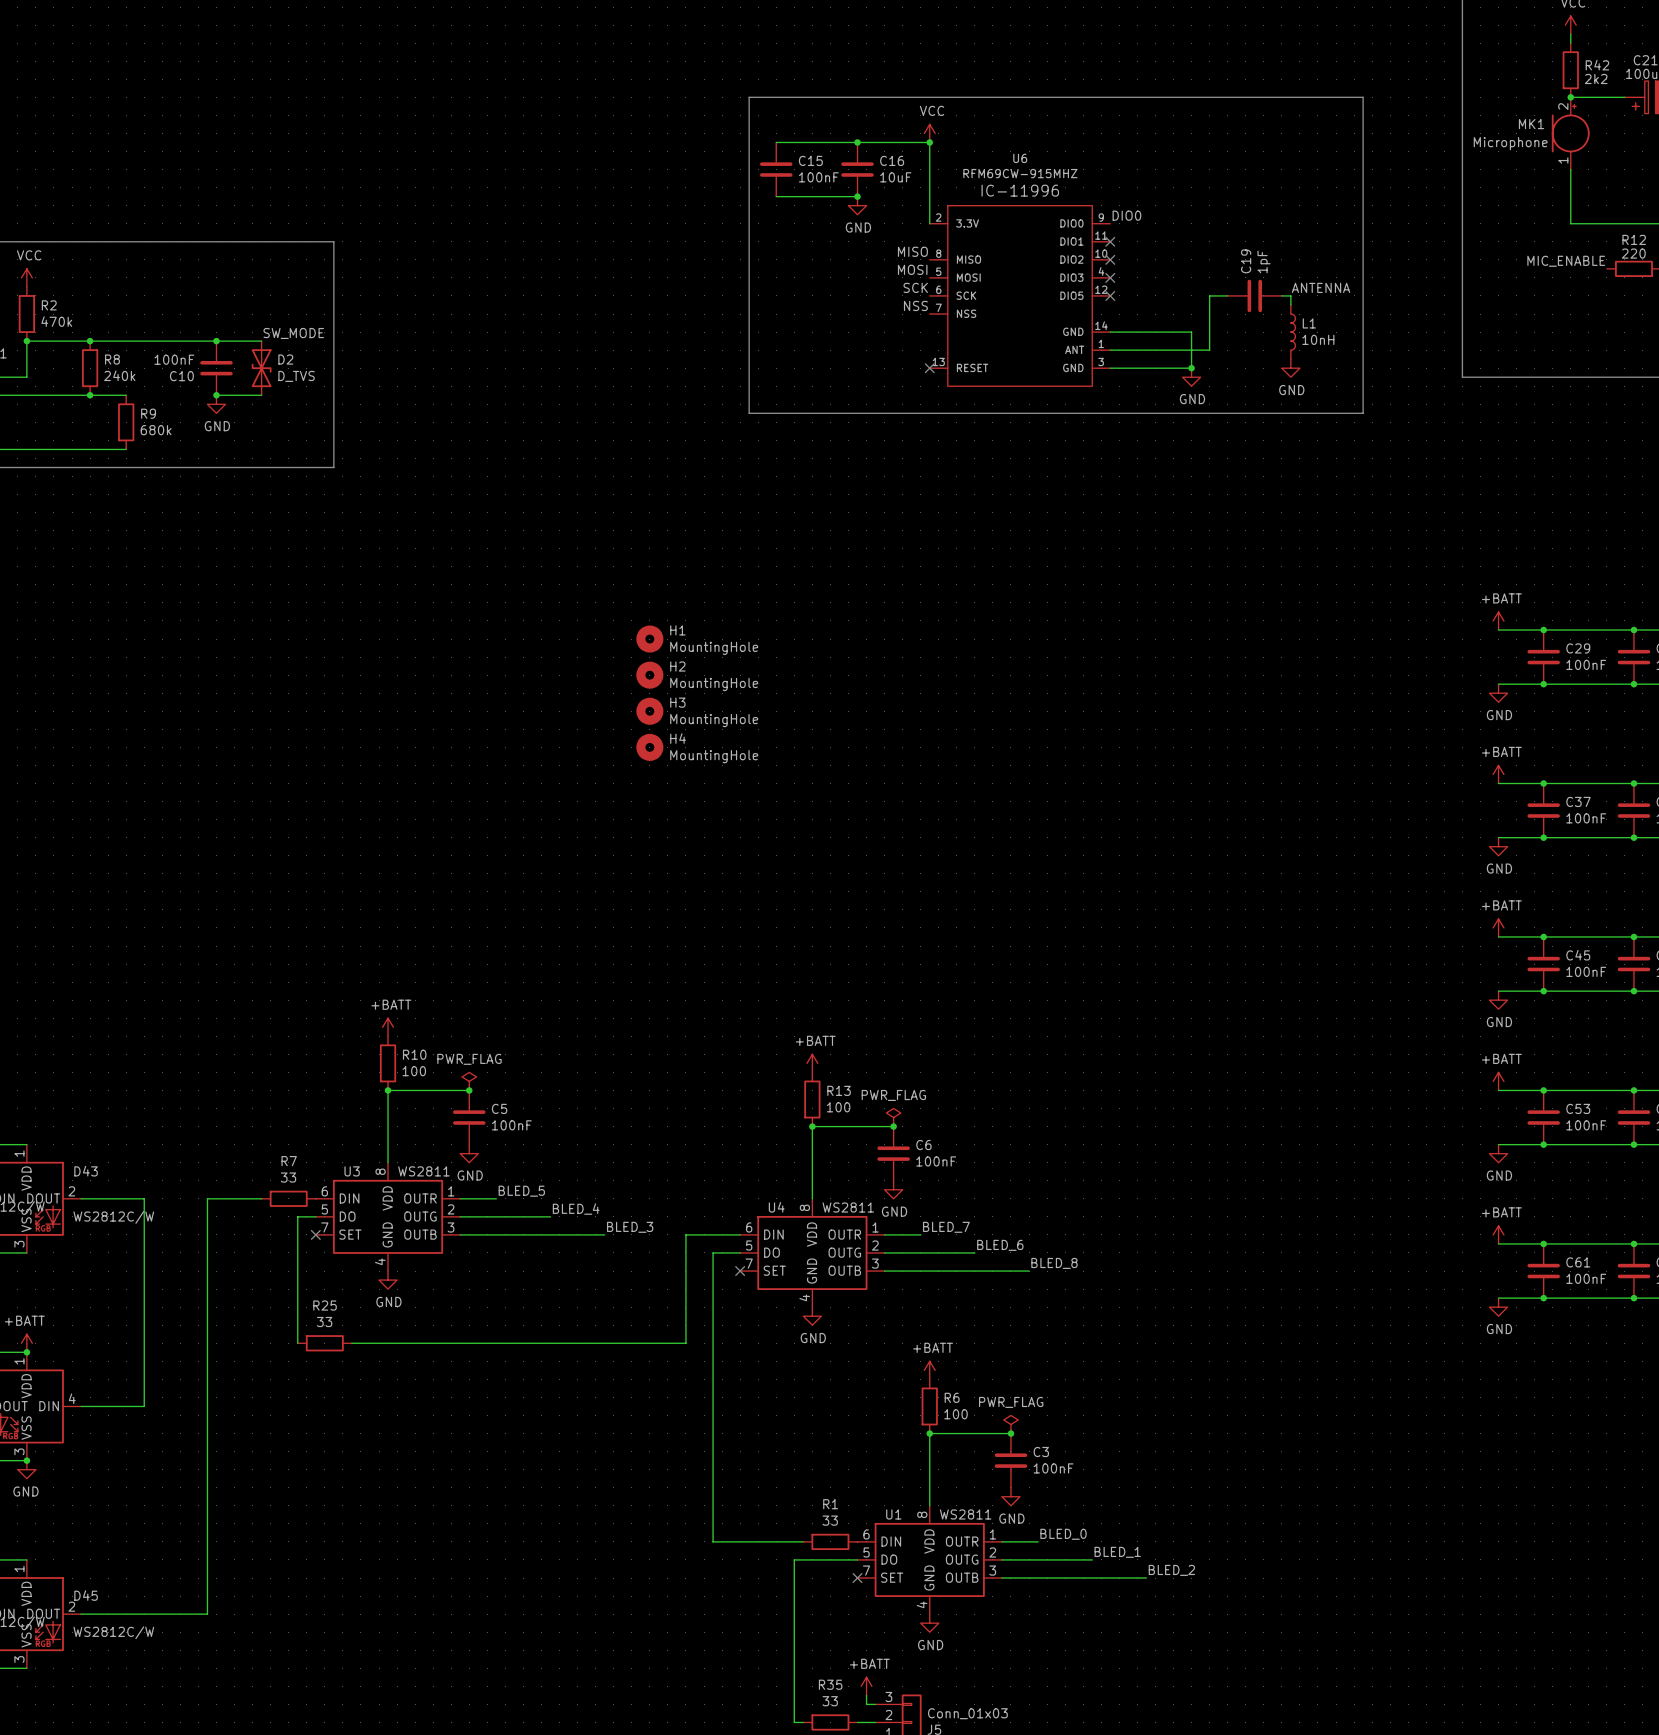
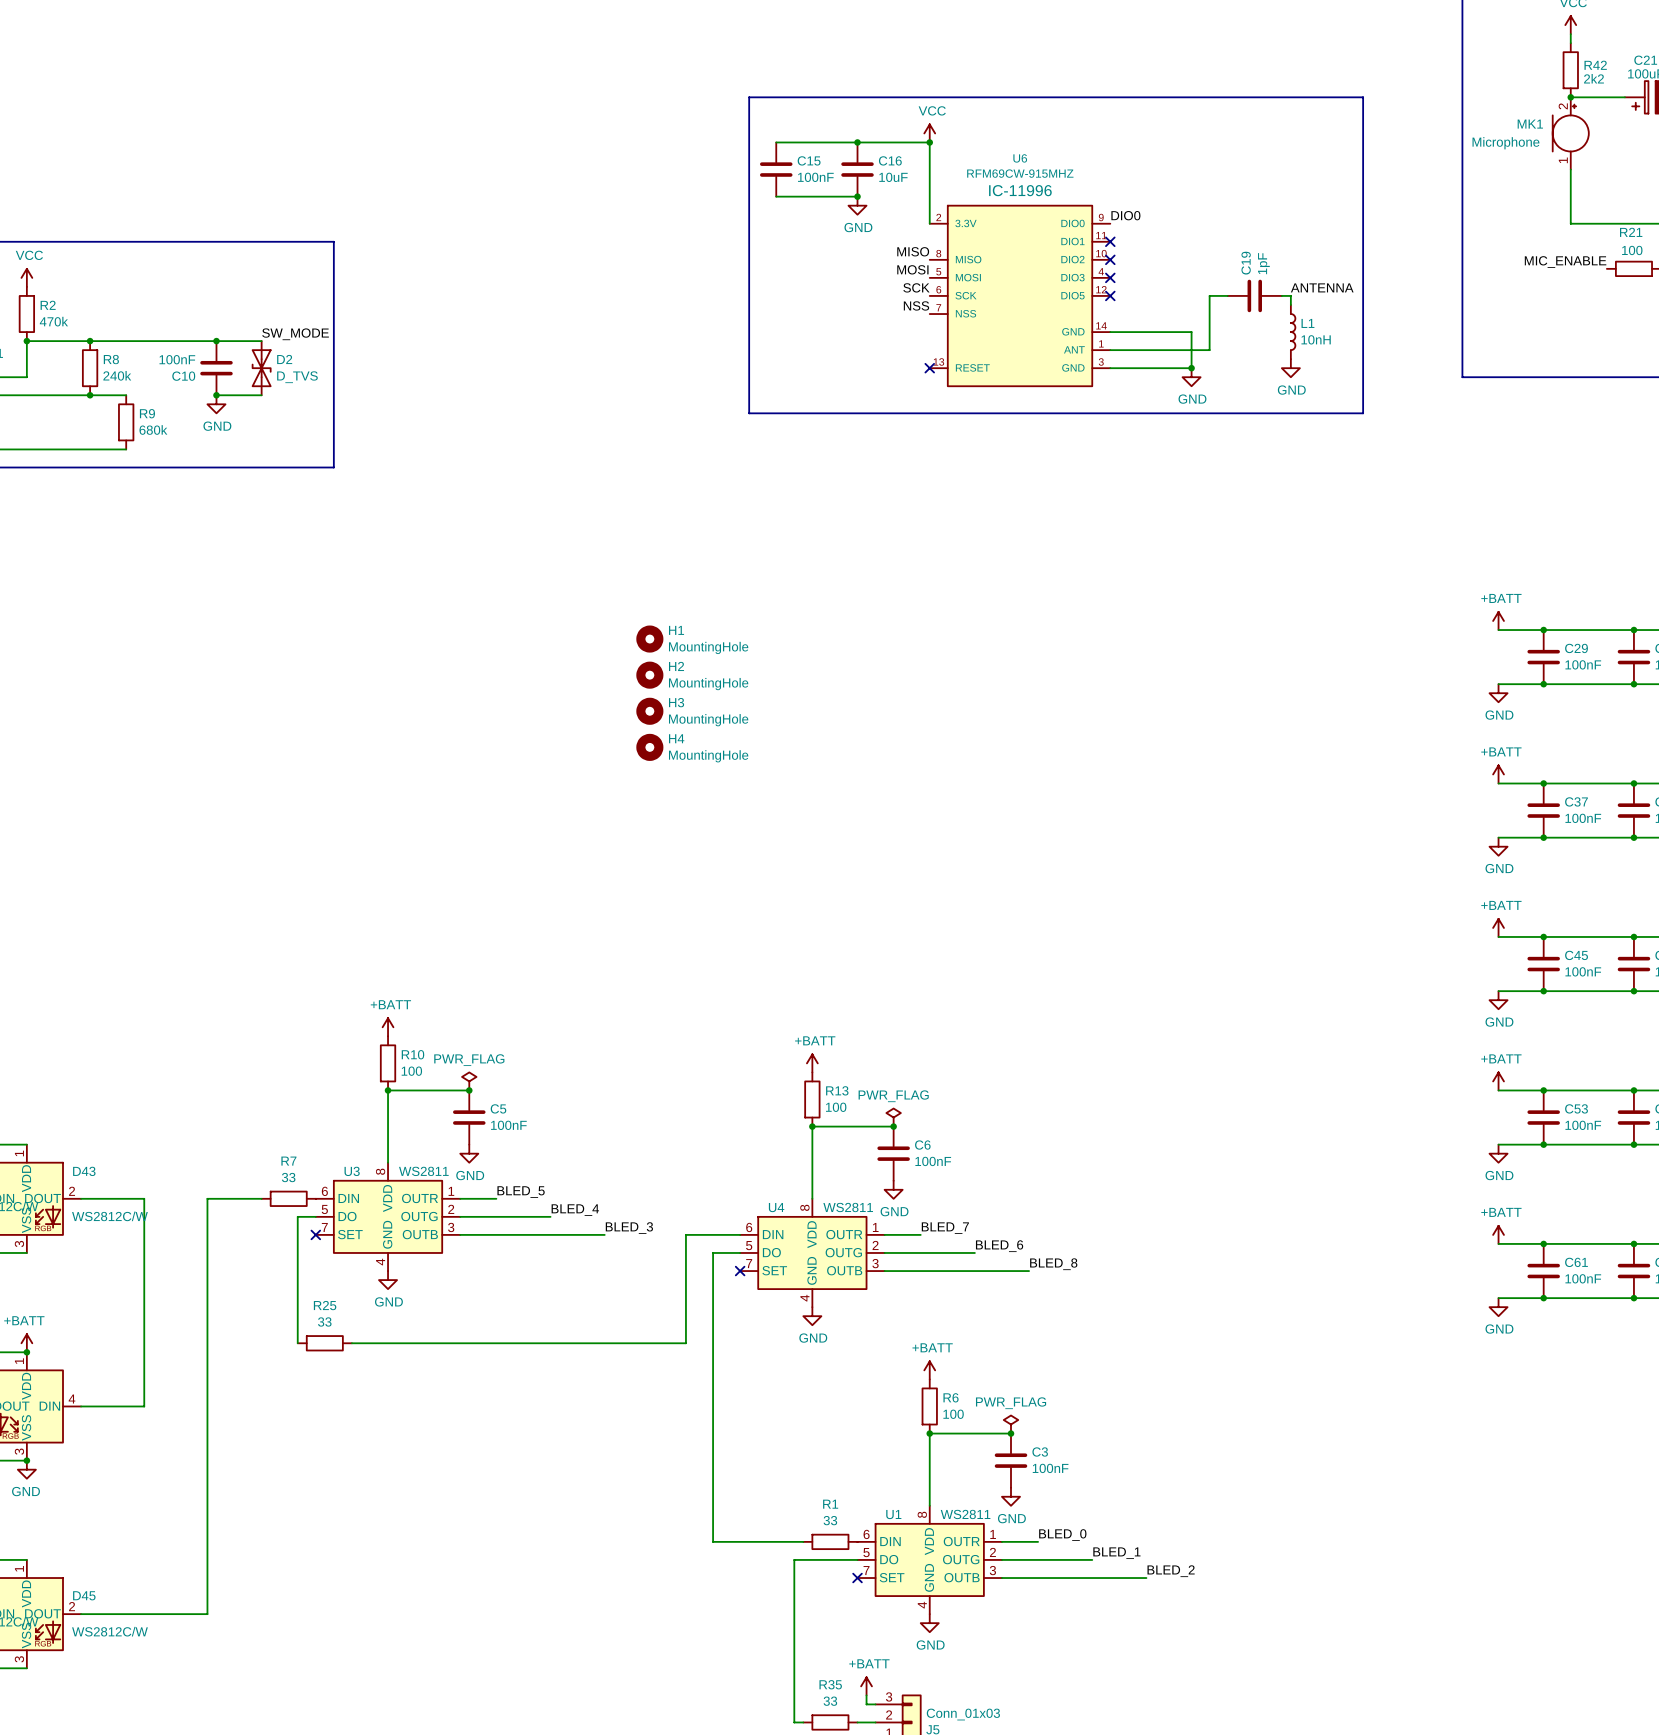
R12 name: R12 (1634, 239) -> R21 (1631, 232)
R12 value: 220 (1633, 253) -> 100 (1632, 250)

